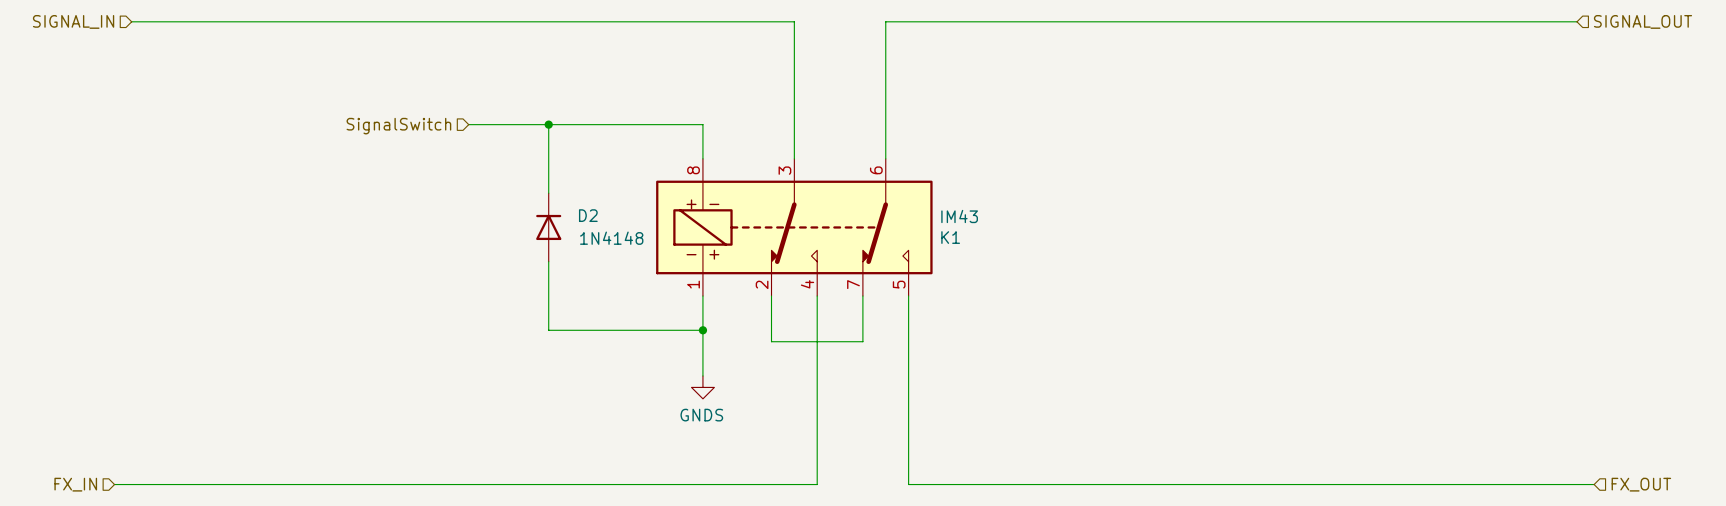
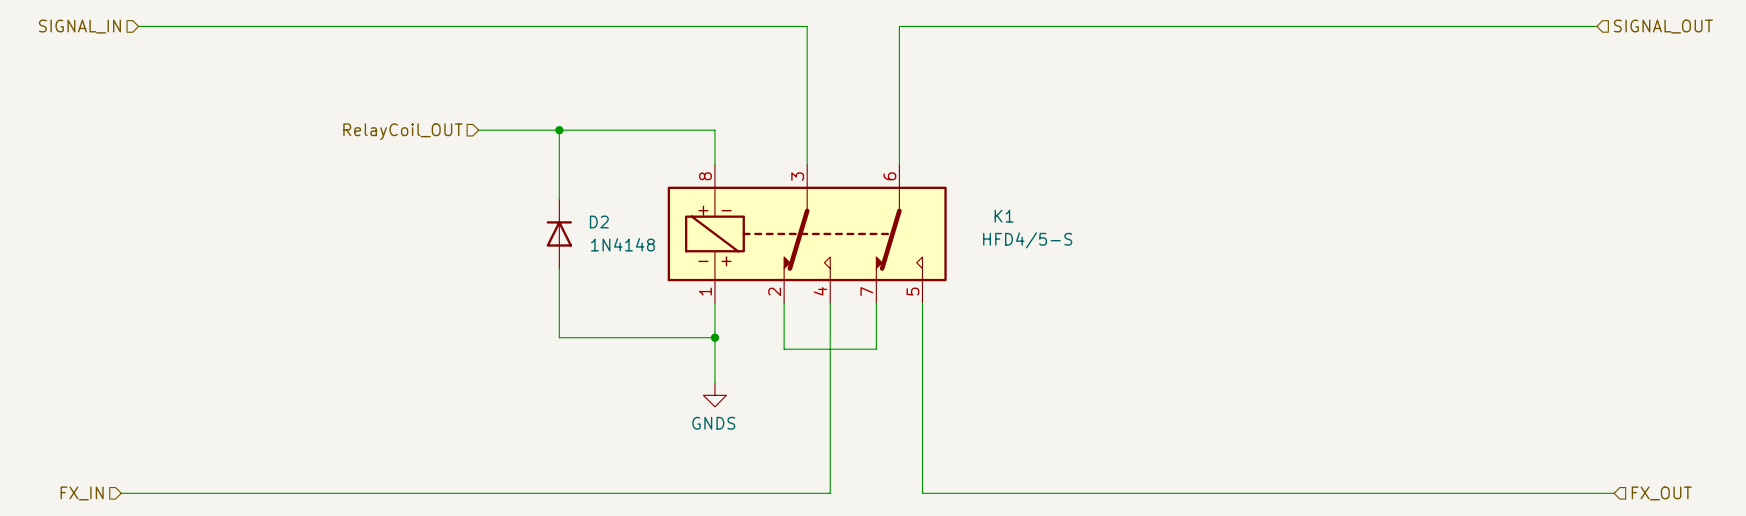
hierarchical label: SignalSwitch (398, 126) -> RelayCoil_OUT (402, 131)
K1 value: IM43 (959, 216) -> HFD4/5-S (1027, 240)
K1 name position: K1 (950, 237) -> K1 (1004, 216)

